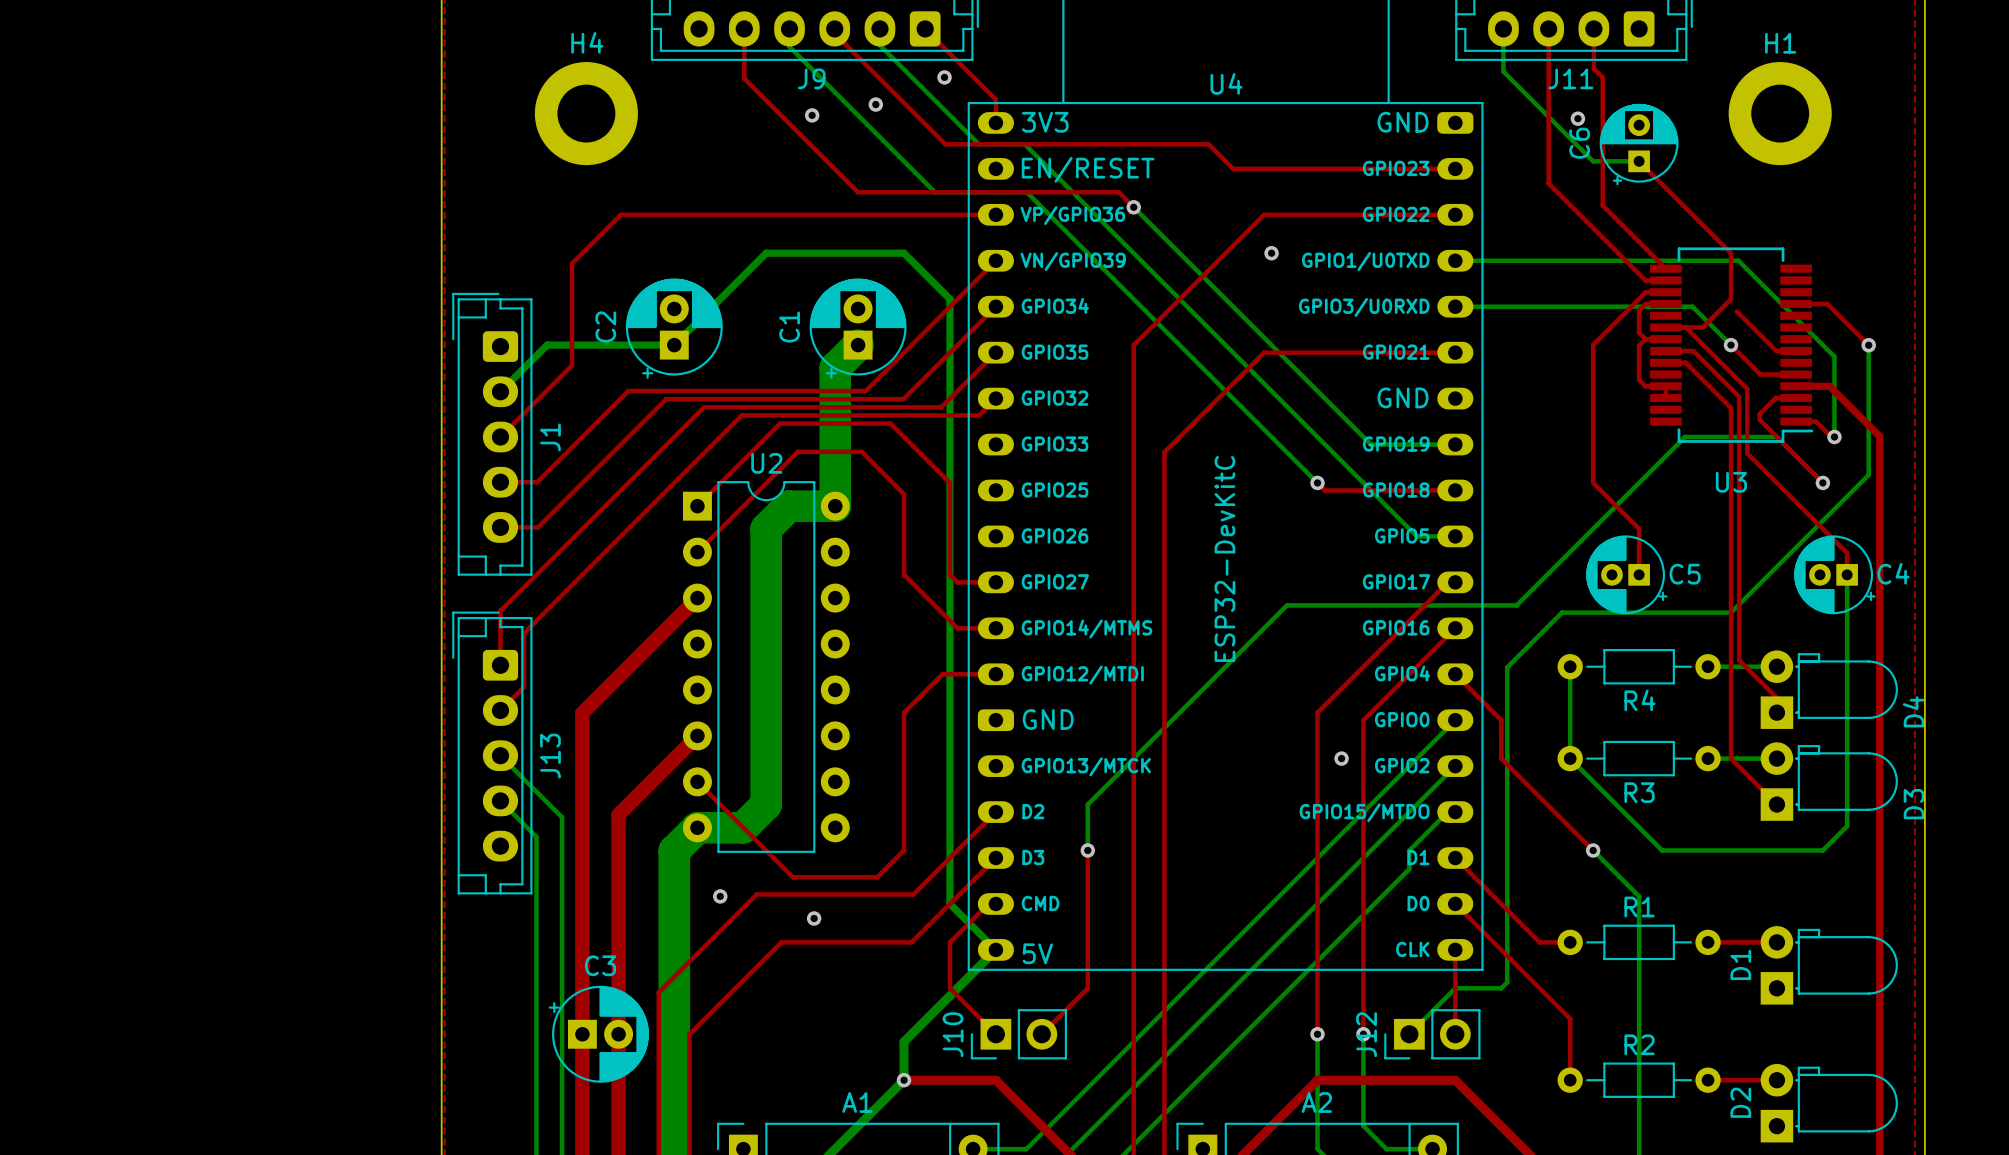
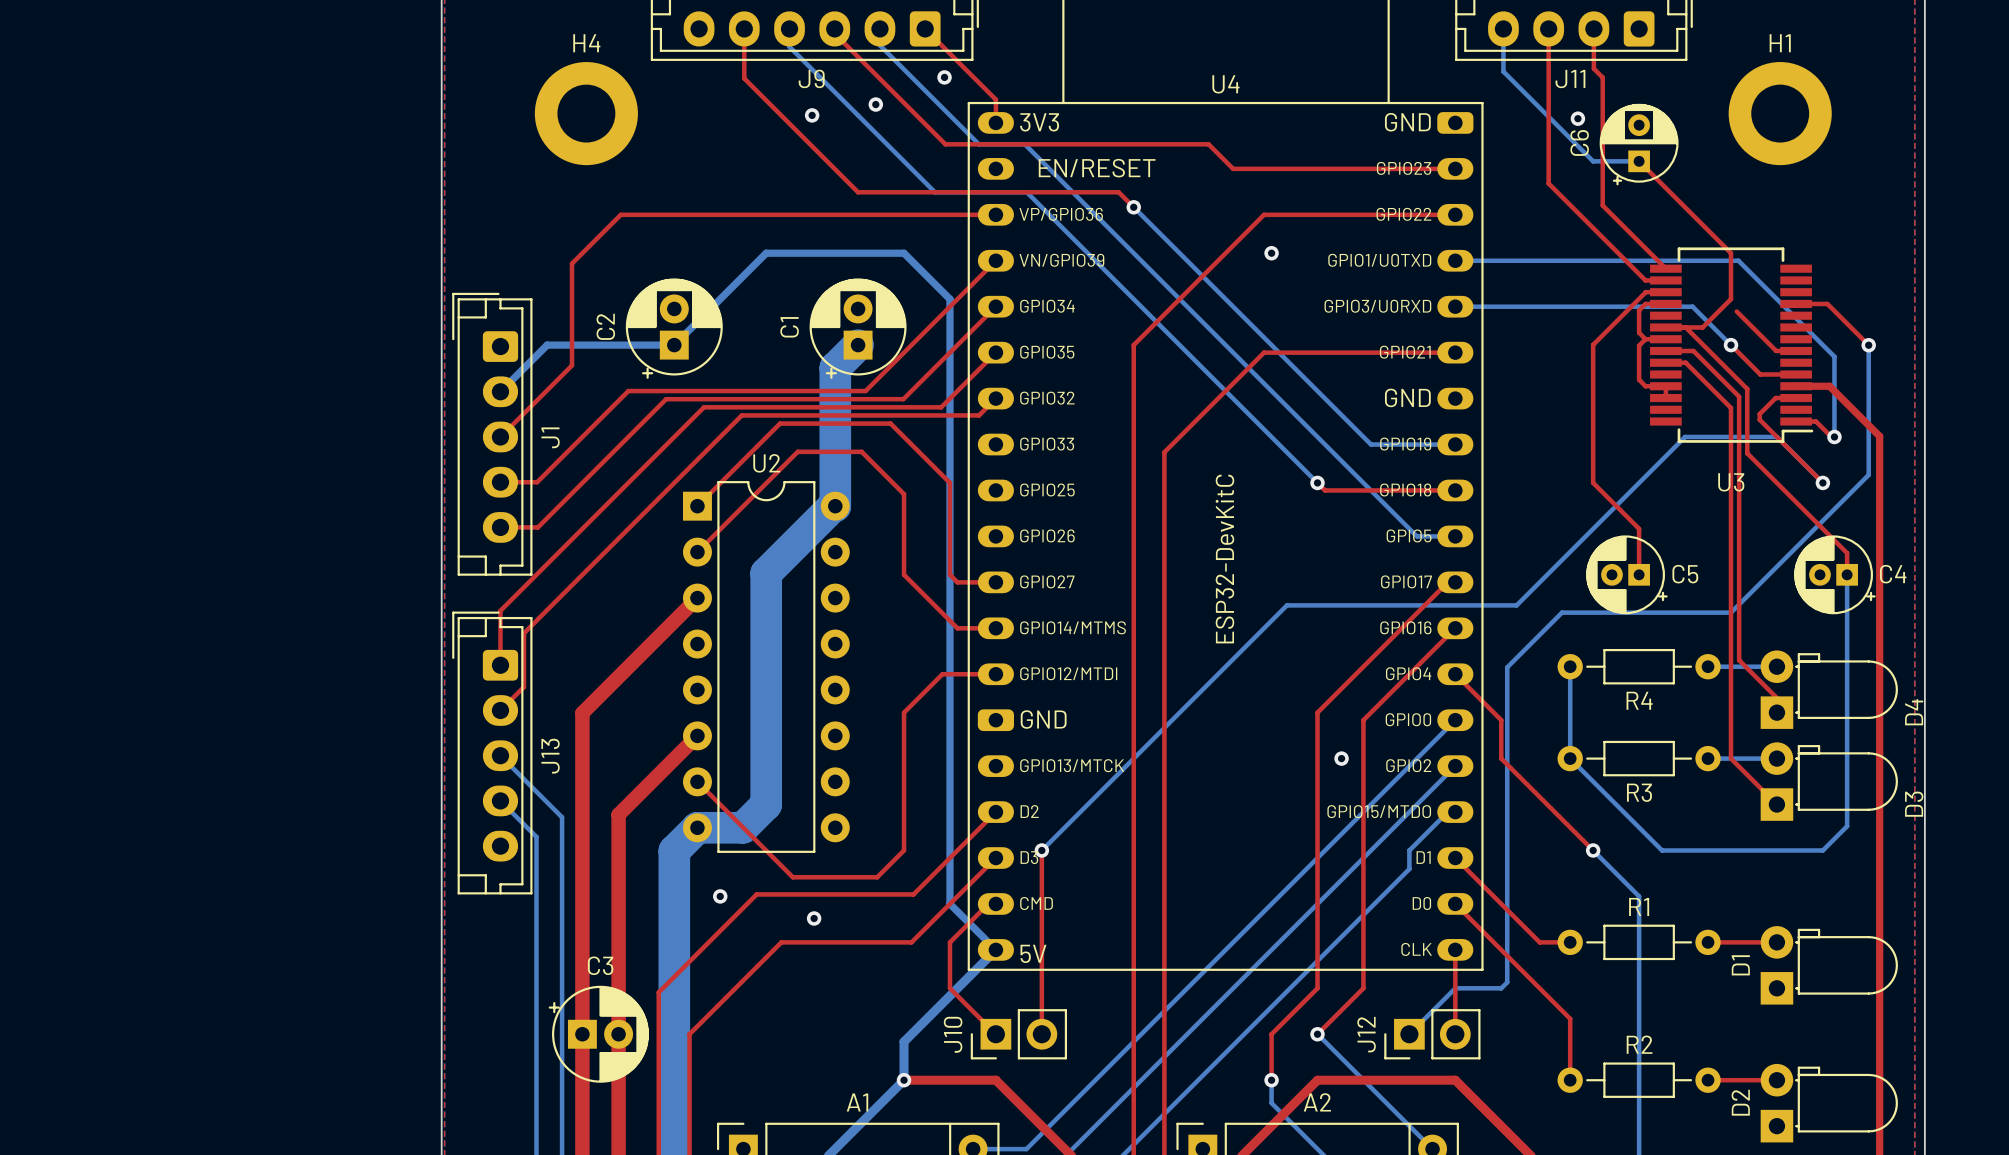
bottom track: (833, 506) (788, 506) (766, 528) (766, 573) -> (833, 506) (766, 573)
bottom track: (1087, 804) (1087, 850) -> (1087, 804) (1041, 850)
top track: (1087, 850) (1087, 988) (1041, 1034) -> (1041, 850) (1041, 1034)
via position: (1087, 850) -> (1041, 850)
top track: (1317, 988) (1317, 1034) -> (1363, 988) (1317, 1034)
top track: none -> (1317, 988) (1271, 1034) (1271, 1080)
top track: (1363, 988) (1363, 1034) -> none
bottom track: (1317, 1034) (1317, 1149) -> (1271, 1080) (1271, 1103) (1317, 1149)
bottom track: (1363, 1034) (1363, 1126) (1386, 1149) (1432, 1149) -> (1317, 1034) (1432, 1149)
via position: (1363, 1034) -> (1271, 1080)

